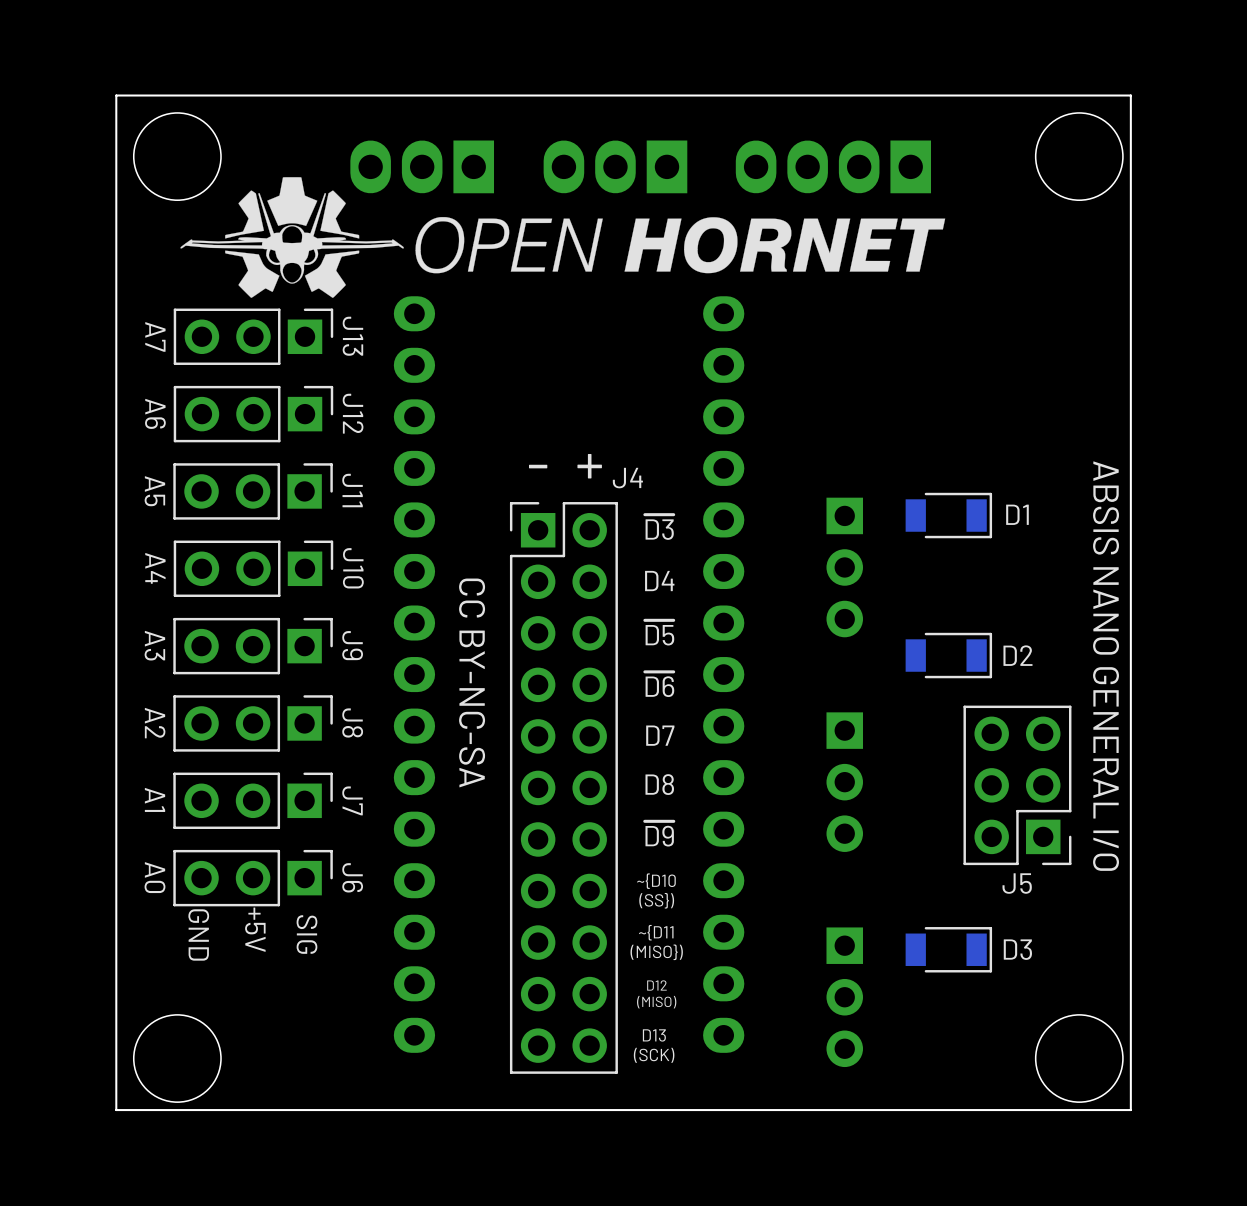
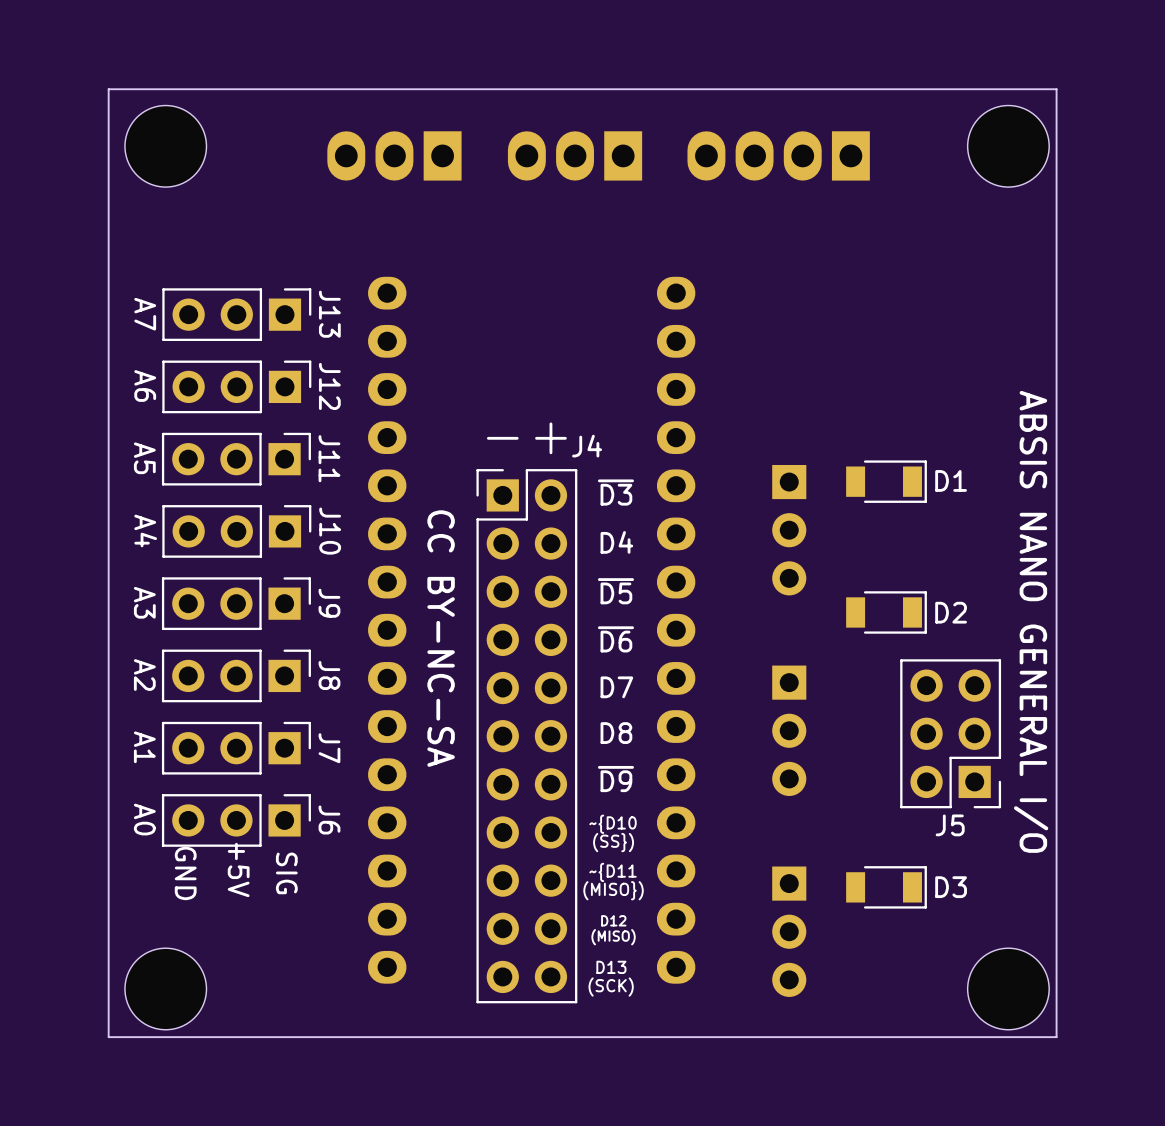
drawing: [180, 177, 946, 298] -> none

